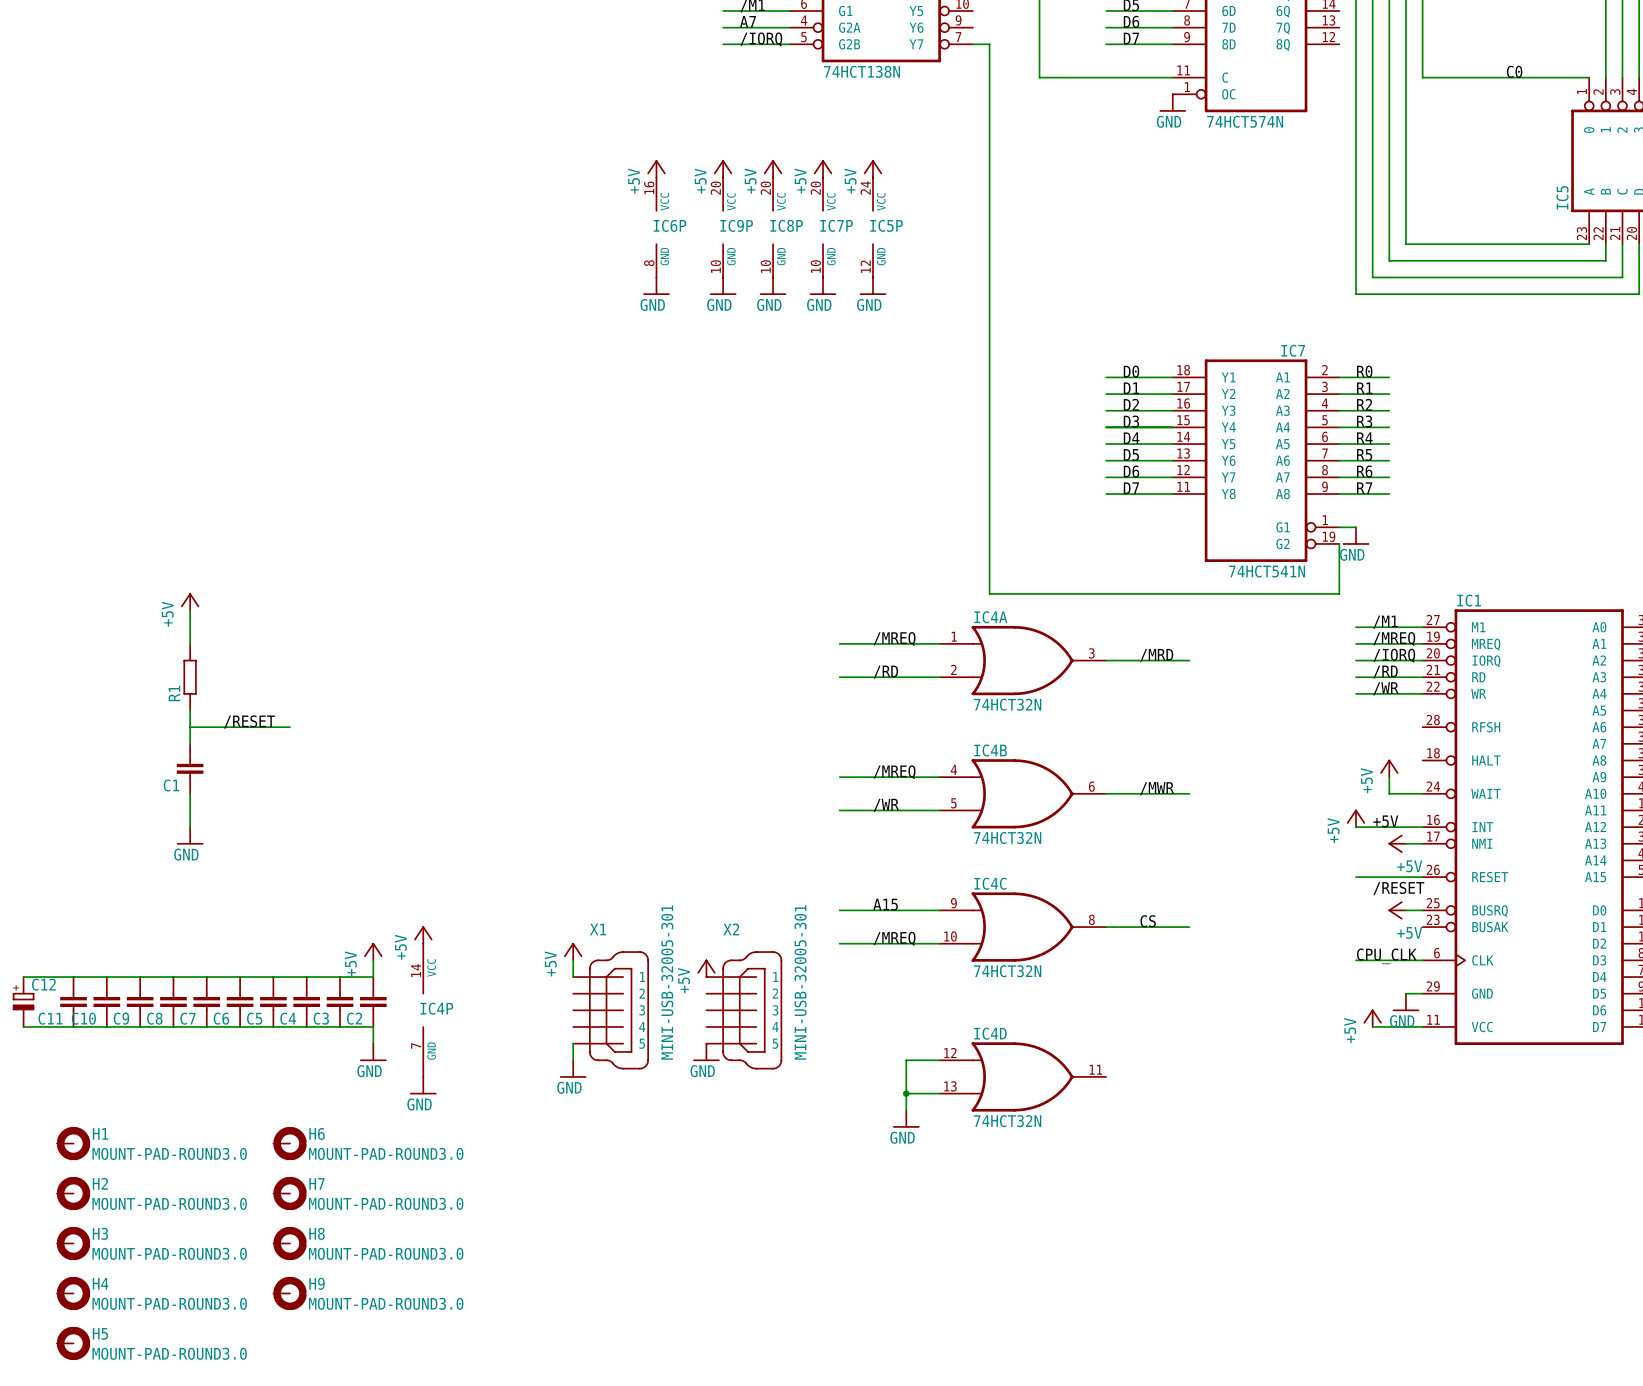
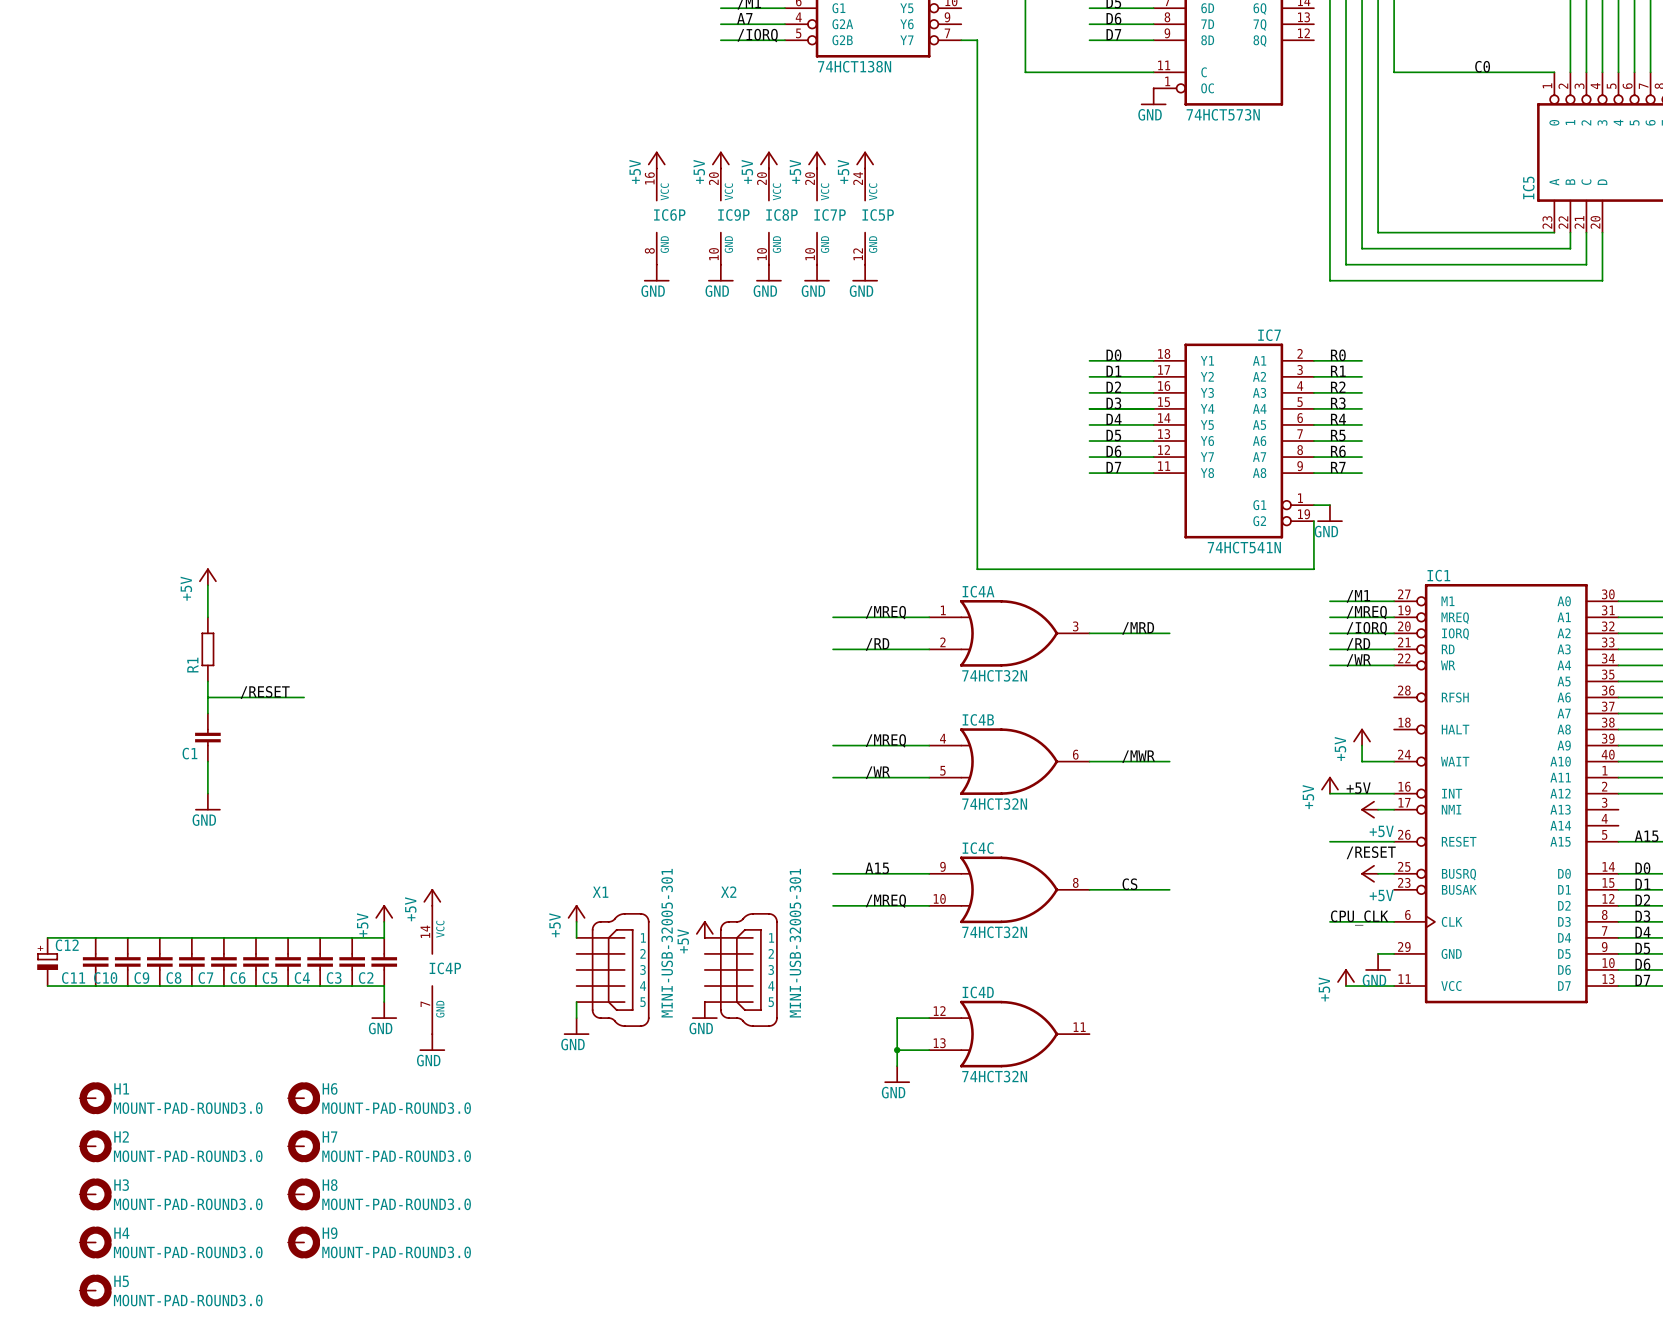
part value: 74HCT574N (1245, 121) -> 74HCT573N (1223, 114)

